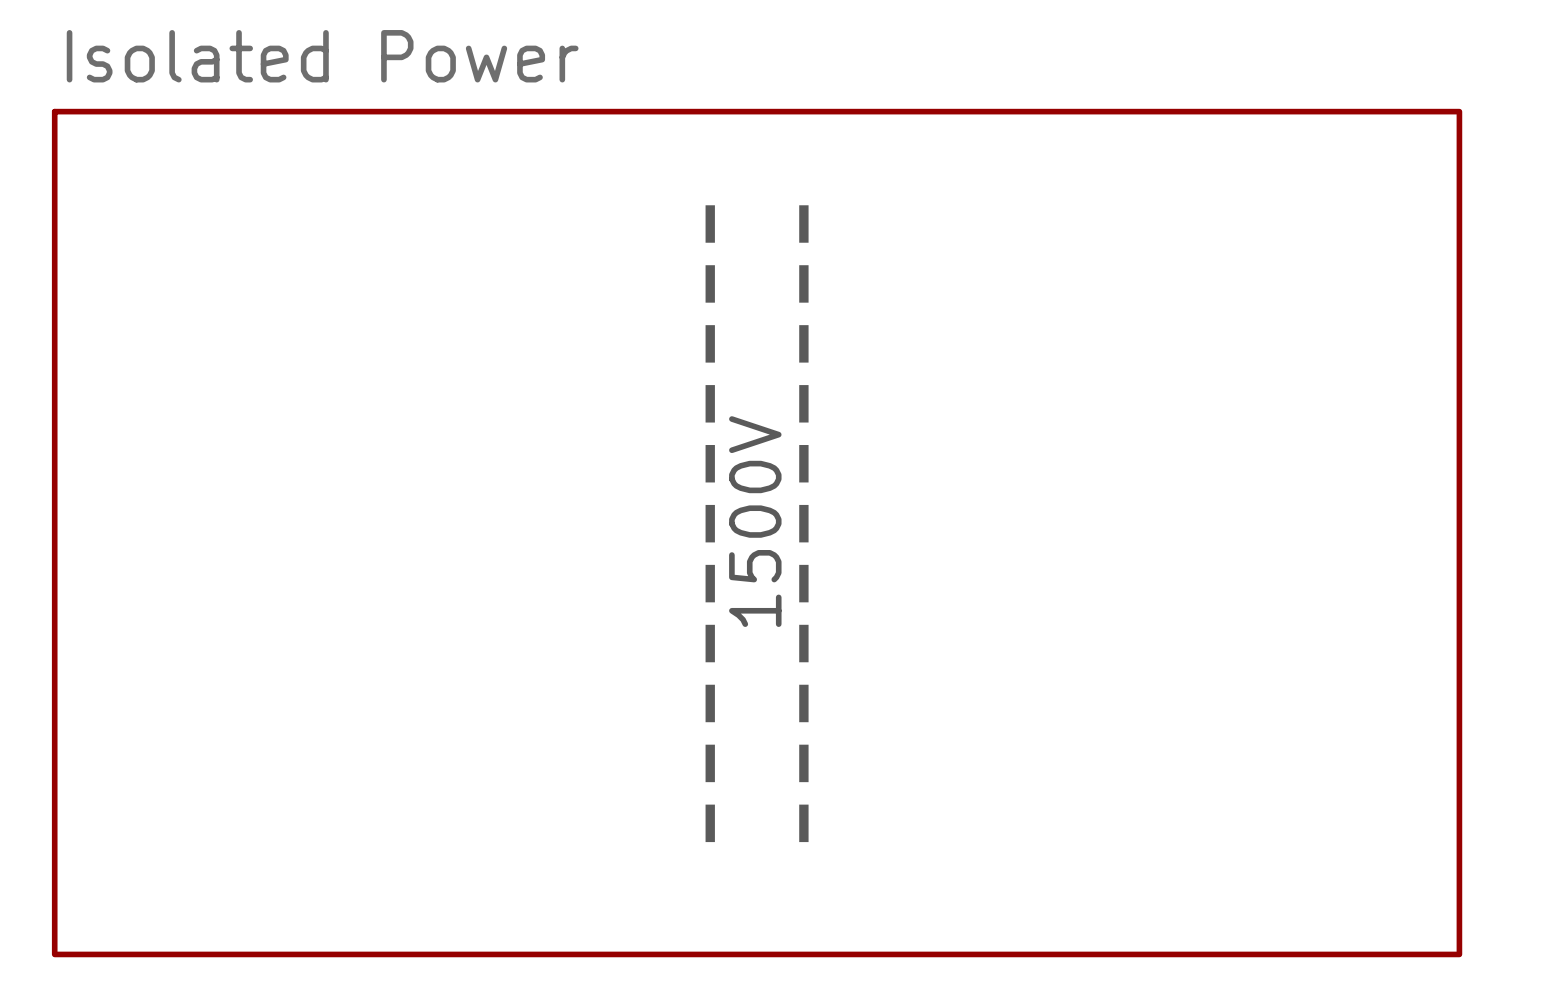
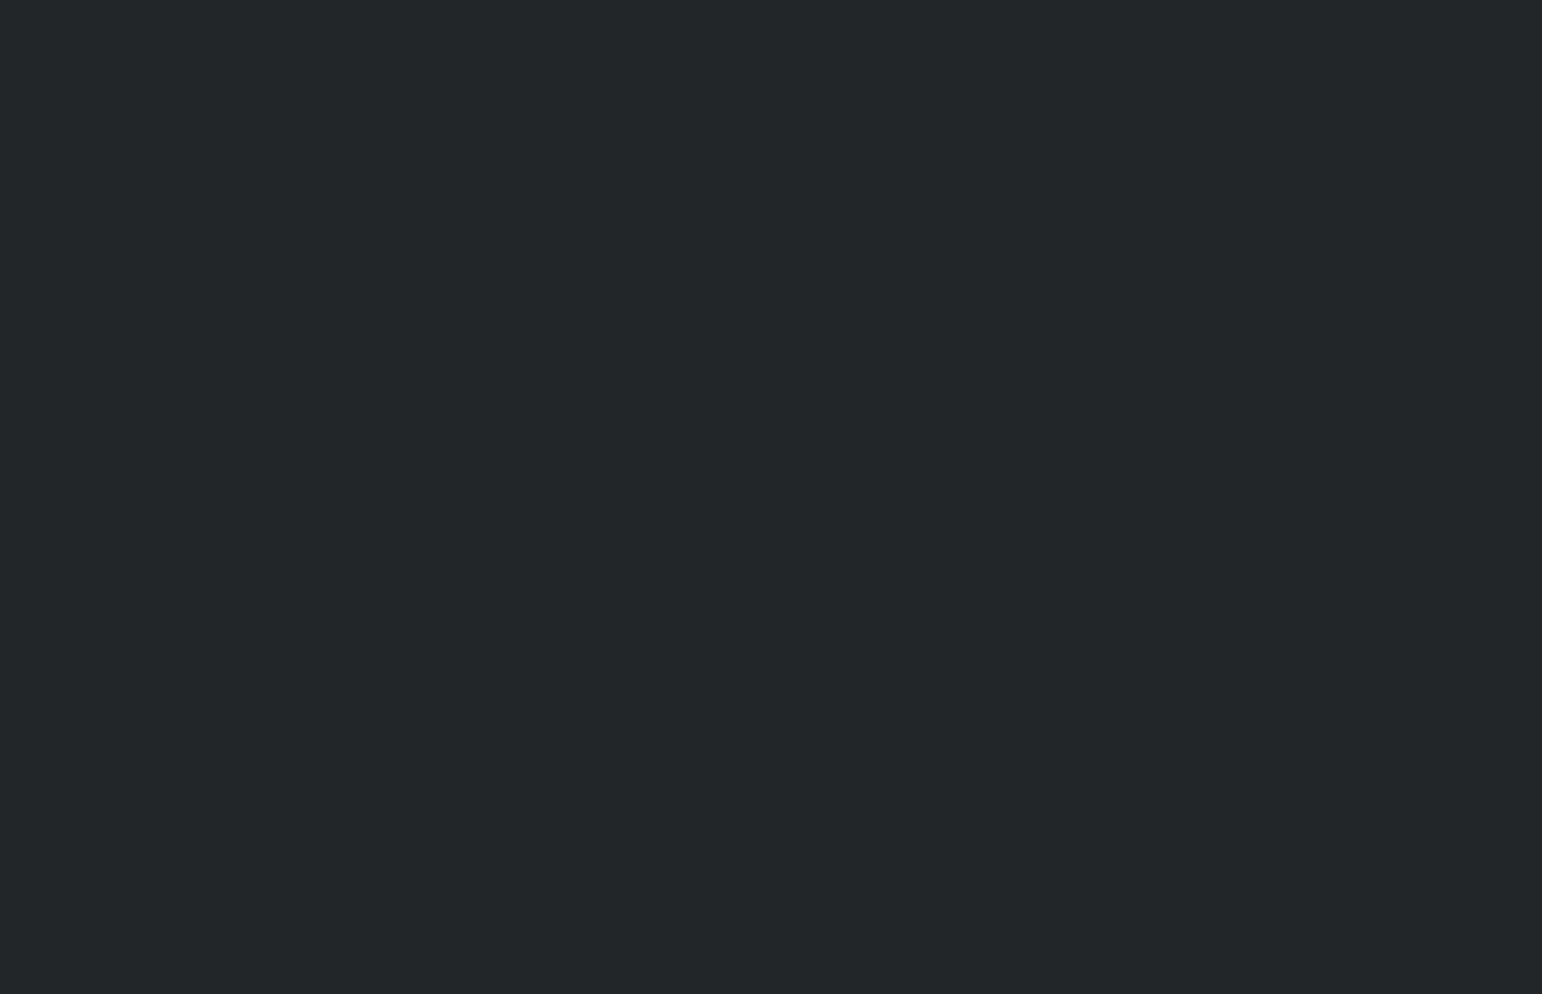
line: (710, 205) (710, 860) -> none
line: (803, 205) (803, 860) -> none
text: 1500V (755, 521) -> none
sheet Isolated Power: (757, 533) -> none

